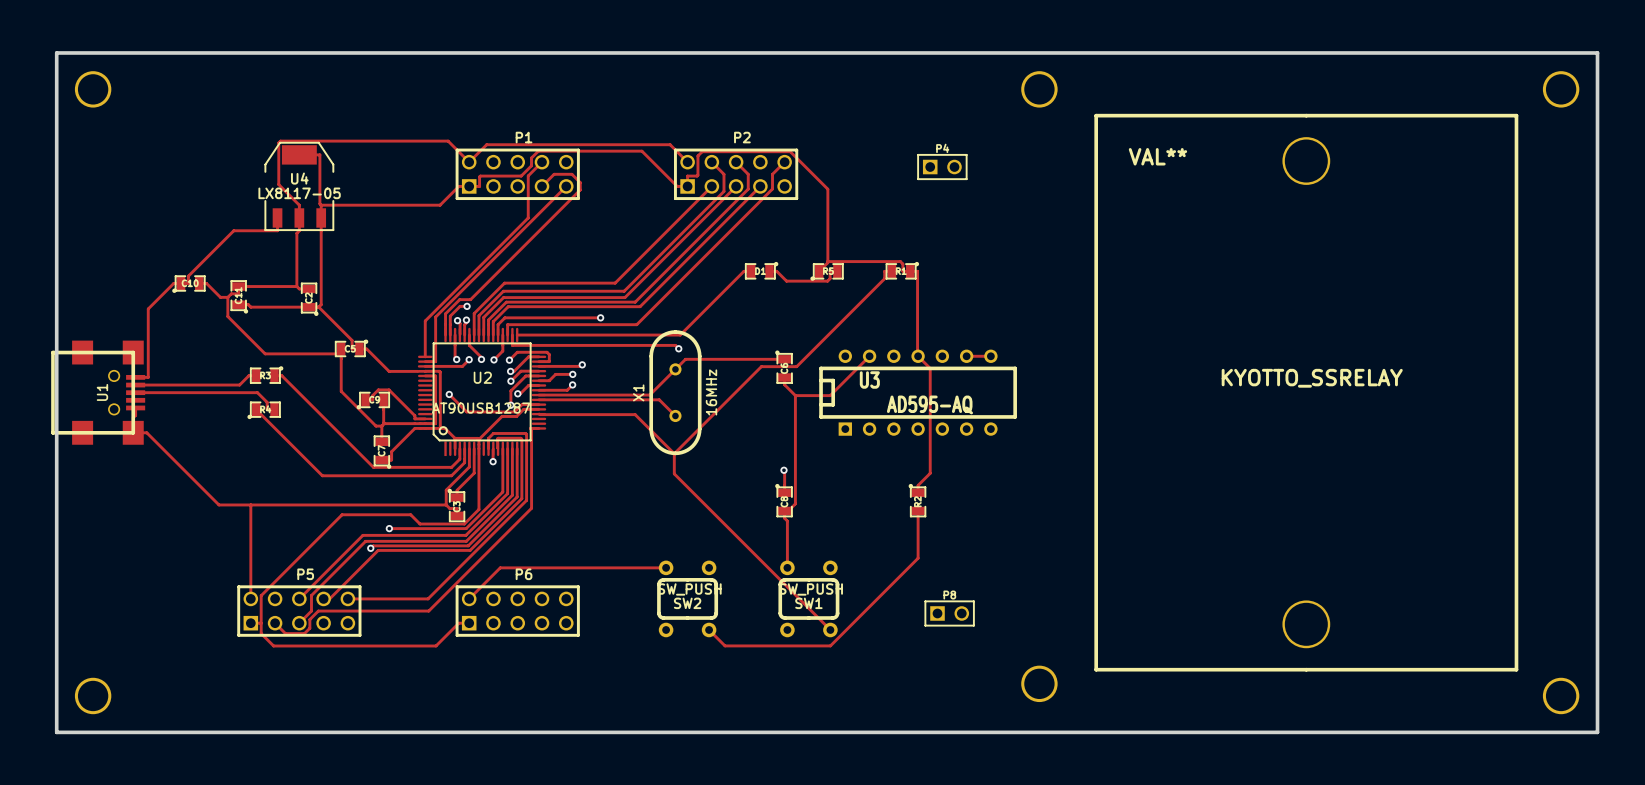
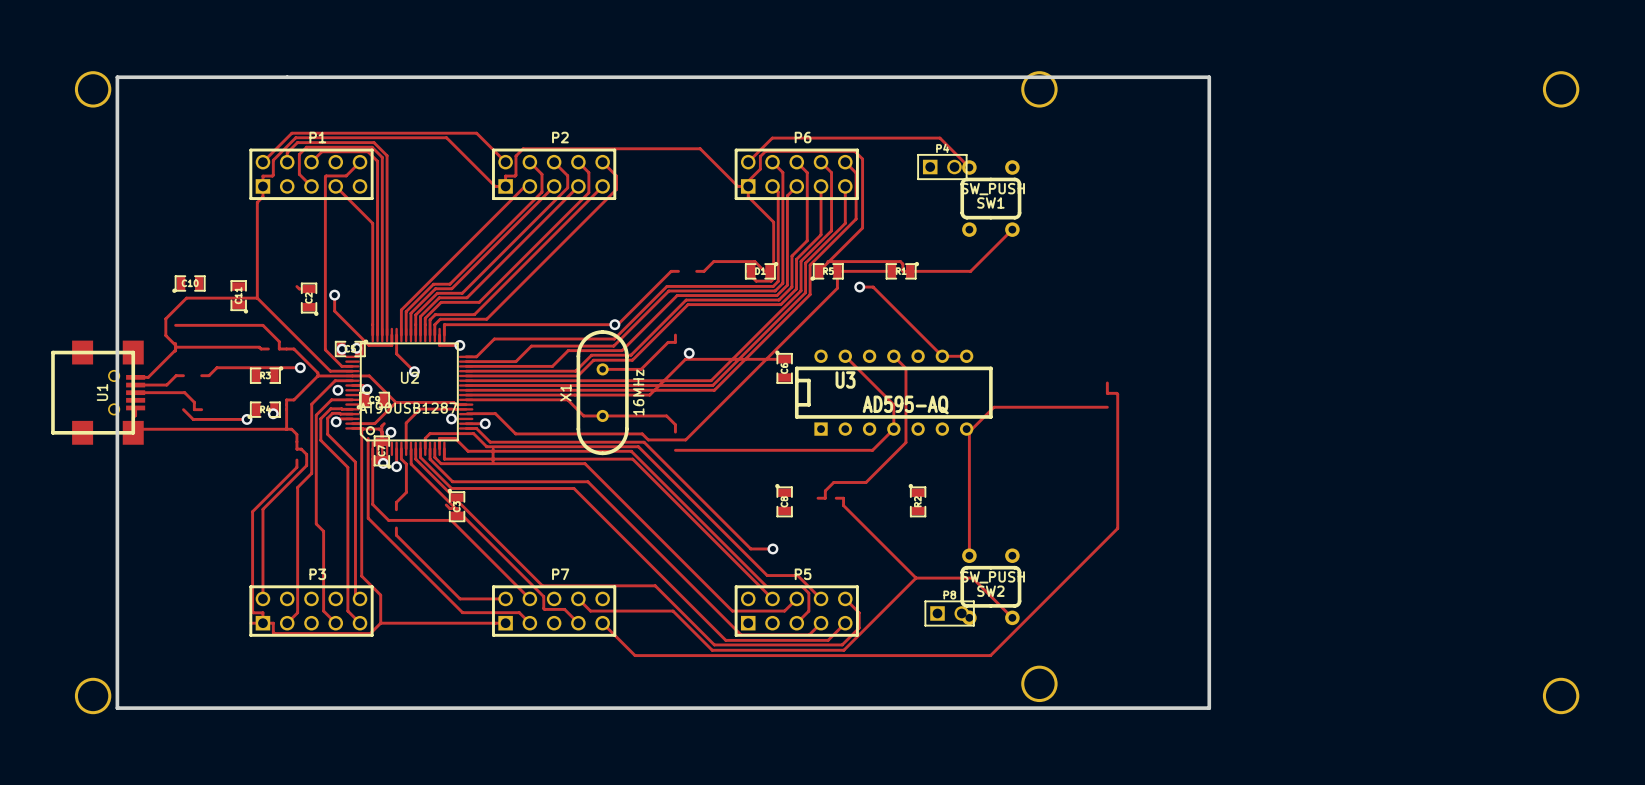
board edge: (56, 52) (1597, 52) (1597, 732) (56, 732) (56, 52) -> (117, 77) (117, 708) (1209, 708) (1209, 77) (117, 77)
track: (299, 154) (319, 154) (321, 205) -> none
track: none -> (262, 162) (291, 133) (476, 133) (505, 162)
track: none -> (287, 162) (287, 152) (297, 142) (373, 142) (387, 155) (387, 335)
track: none -> (311, 162) (321, 151) (368, 151) (377, 161) (377, 335)
track: none -> (360, 162) (346, 175) (325, 176) (325, 349) (341, 366) (352, 366)
track: none -> (529, 162) (542, 174) (542, 192) (449, 284) (433, 284) (406, 311) (406, 335)
track: (542, 162) (528, 175) (528, 218) (425, 320) -> (578, 162) (588, 172) (588, 192) (479, 302) (441, 302) (425, 318) (425, 320)
track: none -> (554, 162) (567, 175) (567, 187) (462, 293) (437, 293) (415, 314) (415, 335)
track: none -> (602, 162) (616, 176) (616, 189) (486, 319) (440, 319) (434, 324) (434, 335)
track: (687, 162) (670, 144) (486, 144) (469, 162) (448, 141) (280, 141) (278, 142) (278, 184) (299, 205) (299, 230) (296, 233) (296, 286) (238, 286) (238, 293) (231, 293) (227, 297) -> none
track: (711, 162) (723, 174) (723, 191) (624, 291) (503, 291) (478, 315) (478, 335) -> none
track: (736, 162) (748, 174) (748, 186) -> none
track: none -> (748, 162) (772, 138) (939, 138) (969, 167)
track: none -> (772, 162) (782, 172) (782, 283) (775, 290) (668, 290) (613, 346) (531, 346) (515, 361) (466, 361)
track: (784, 162) (772, 174) (772, 188) (636, 324) (617, 324) -> (678, 271) (671, 271) (617, 324)
track: none -> (796, 162) (807, 172) (807, 240) (791, 256) (791, 287) (778, 300) (686, 300) (631, 355) (591, 355) (575, 371) (538, 371)
P1 position: (517, 174) -> (311, 174)
P2 position: (736, 174) -> (554, 174)
track: (505, 176) (480, 176) (479, 186) (458, 186) (440, 205) (321, 205) -> (505, 176) (505, 186) (495, 186) (446, 137) (295, 137) (273, 160) (273, 175) (262, 176) (262, 196) (257, 202) (257, 298)
track: (515, 176) (521, 176) (531, 165) (531, 157) (538, 151) (641, 151) (677, 186) (687, 186) (687, 176) (697, 175) (697, 155) (702, 151) (790, 151) (827, 189) (827, 262) -> (515, 176) (515, 156) (523, 148) (700, 148) (737, 186) (748, 186)
U4: LX8117-05 (299, 186) -> none
track: none -> (311, 186) (299, 174) (299, 154) (306, 147) (372, 147) (382, 157) (382, 335)
track: none -> (335, 186) (372, 223) (372, 335)
track: none -> (529, 186) (524, 186) (401, 309) (401, 335)
track: (542, 186) (554, 174) (571, 174) (580, 182) (580, 189) (470, 299) (459, 299) (445, 313) (445, 335) -> none
track: none -> (554, 186) (451, 288) (435, 288) (410, 313) (410, 335)
track: (566, 186) (435, 317) (435, 361) (425, 361) -> none
track: none -> (578, 186) (467, 297) (439, 297) (420, 316) (420, 335)
track: none -> (602, 186) (474, 314) (435, 314) (430, 319) (430, 335)
track: (711, 186) (615, 283) (504, 283) (474, 313) (474, 335) -> none
track: (736, 186) (624, 297) (503, 297) (483, 317) (483, 335) -> none
track: none -> (743, 186) (760, 169) (760, 156) (765, 151) (854, 151) (862, 159) (862, 227) (827, 262)
track: (760, 186) (640, 306) (508, 306) (493, 321) (493, 335) -> none
track: none -> (772, 186) (778, 192) (778, 281) (773, 286) (666, 286) (614, 339) (494, 339) (476, 356) (466, 356)
track: none -> (821, 186) (821, 234) (796, 259) (796, 288) (780, 304) (688, 304) (632, 360) (593, 360) (577, 375) (538, 375)
track: none -> (845, 186) (845, 223) (805, 263) (805, 292) (712, 385) (538, 385)
track: (748, 189) (635, 302) (506, 302) (488, 320) (488, 335) -> (748, 189) (748, 196) (773, 222) (773, 278) (771, 281) (756, 281) (753, 278) (753, 271) (751, 271)
track: (321, 205) (321, 304) (318, 307) -> none
track: (277, 217) (277, 230) (233, 230) (188, 276) (188, 283) (173, 283) (148, 308) (148, 377) -> (175, 343) (175, 350) (148, 377)
track: none -> (696, 271) (704, 271) (713, 261) (754, 261) (764, 271)
track: (746, 271) (743, 271) (680, 335) (517, 335) -> none
track: (769, 271) (776, 271) (786, 281) (827, 281) (830, 278) (830, 271) (837, 271) -> none
track: (884, 271) (884, 278) (796, 366) (761, 366) (674, 453) -> (884, 271) (837, 271) (837, 288) (685, 439) (648, 439) (642, 433) (515, 433) (495, 413) (467, 413)
track: (917, 271) (917, 355) (930, 368) (930, 473) (918, 485) (918, 492) -> (917, 271) (970, 271) (1012, 229)
track: (199, 283) (206, 283) (220, 297) (227, 297) -> none
via: none -> (859, 287)
track: none -> (334, 295) (334, 311) (368, 345) (391, 345) (391, 335)
via: none -> (334, 295)
track: (227, 297) (227, 316) (265, 353) (341, 353) -> none
track: none -> (257, 298) (330, 371) (352, 371)
track: none -> (257, 298) (186, 298) (165, 318) (165, 335) (175, 345)
track: (238, 304) (248, 304) (250, 307) (318, 307) -> none
track: (467, 306) (460, 306) (450, 316) (450, 335) -> none
via: (467, 306) -> none
track: (318, 307) (352, 340) (352, 349) (366, 349) (389, 371) (425, 371) -> none
track: (600, 317) (504, 317) (498, 324) (498, 335) -> none
via: (600, 317) -> none
track: (457, 320) (460, 323) (459, 335) -> none
via: (457, 320) -> none
track: (466, 320) (464, 335) -> none
via: (466, 320) -> none
track: (507, 324) (507, 335) -> (507, 324) (444, 324) (444, 335)
via: none -> (614, 324)
track: none -> (175, 325) (262, 325) (279, 341) (279, 349) (293, 349) (317, 373) (317, 375)
track: none -> (396, 335) (396, 353) (414, 371)
track: (425, 335) (425, 356) -> none
track: none -> (439, 335) (439, 345) (459, 345)
track: (455, 335) (456, 359) -> none
track: (469, 335) (469, 345) (481, 359) -> none
track: (502, 335) (502, 351) (493, 359) -> none
track: (512, 335) (512, 345) (675, 345) (678, 348) -> none
track: none -> (675, 335) (675, 342) (668, 342) (641, 369) (602, 369)
via: none -> (459, 345)
track: none -> (175, 347) (259, 347) (268, 349)
via: none -> (356, 348)
via: (678, 348) -> none
track: (341, 349) (341, 391) (376, 426) (381, 426) -> none
via: none -> (342, 349)
via: none -> (689, 353)
track: (538, 356) (528, 356) (514, 371) (510, 371) -> none
track: none -> (845, 356) (893, 404) (893, 429) (872, 450) (675, 450)
track: (869, 356) (830, 395) (795, 395) -> none
track: none -> (893, 356) (905, 368) (905, 442) (866, 482) (833, 482) (825, 490) (825, 498) (818, 498)
track: (966, 356) (990, 356) -> (966, 356) (942, 356) (873, 287) (859, 287)
via: (456, 359) -> none
track: (469, 359) (462, 366) (425, 366) -> none
via: (469, 359) -> none
via: (481, 359) -> none
via: (493, 359) -> none
track: (509, 360) (517, 352) (547, 352) (549, 354) (549, 361) (538, 361) -> none
via: (509, 360) -> none
track: (582, 364) (552, 366) -> (796, 186) (787, 195) (787, 285) (777, 295) (677, 295) (622, 350) (568, 350) (552, 366)
via: (582, 364) -> none
track: none -> (466, 366) (538, 366)
track: none -> (300, 367) (216, 367) (209, 375) (201, 375)
via: none -> (300, 367)
via: none -> (414, 371)
track: (425, 371) (440, 372) (440, 428) -> none
via: (510, 371) -> none
track: (520, 371) (510, 381) -> (520, 371) (466, 371)
track: (572, 374) (555, 374) (549, 380) -> (821, 162) (831, 172) (831, 230) (801, 261) (801, 290) (711, 380) (549, 380)
via: (572, 374) -> none
track: (256, 375) (248, 375) (239, 385) (166, 385) -> (183, 375) (176, 375) (166, 385)
track: (274, 375) (281, 375) (373, 467) (451, 467) (459, 459) (459, 448) -> none
track: none -> (317, 375) (369, 375) (395, 402)
track: none -> (317, 375) (293, 399) (286, 399) (286, 429)
track: (425, 375) (435, 375) (435, 423) (384, 423) (383, 399) -> none
track: (525, 375) (510, 390) (510, 405) -> (525, 375) (466, 375)
track: (784, 377) (784, 384) (795, 395) -> none
track: none -> (352, 380) (335, 380) (311, 404) (311, 473) (297, 487) (297, 612) (287, 623)
track: none -> (466, 380) (538, 380)
via: (510, 381) -> none
track: none -> (1107, 382) (1107, 393) (1117, 394) (1117, 528) (990, 655) (635, 655) (602, 623)
track: (572, 384) (567, 390) -> (845, 162) (856, 172) (856, 219) (810, 265) (810, 294) (714, 390) (567, 390)
via: (572, 384) -> none
track: none -> (352, 385) (363, 385) (367, 389)
track: (528, 385) (520, 393) (517, 393) -> (528, 385) (466, 385)
via: none -> (367, 389)
via: none -> (337, 390)
track: none -> (466, 390) (538, 390)
U2 position: (482, 391) -> (409, 391)
track: (184, 392) (257, 392) (267, 402) (268, 409) -> (184, 392) (194, 402) (194, 409) (201, 409)
X1 position: (675, 392) -> (602, 392)
U3 position: (918, 392) -> (893, 392)
KYOTTO_SSRELAY: VAL** (1306, 392) -> none
via: (517, 393) -> none
track: (449, 394) (466, 411) (514, 411) (522, 404) (538, 404) -> none
via: (449, 394) -> none
track: none -> (466, 395) (538, 395)
track: (795, 395) (795, 503) (784, 514) -> none
track: none -> (352, 399) (331, 399) (316, 415) (316, 523) (323, 531) (323, 611) (335, 623)
track: (365, 399) (372, 399) (372, 395) (378, 389) (389, 389) (414, 415) (414, 418) (425, 418) -> none
track: none -> (466, 399) (538, 399)
track: (567, 399) (659, 399) (675, 415) -> (567, 399) (583, 415) (666, 415) (675, 424) (675, 432)
track: none -> (395, 402) (453, 402) (455, 404) (466, 404)
track: none -> (395, 402) (374, 423) (352, 423)
via: (510, 405) -> none
track: none -> (1107, 407) (994, 407) (969, 431)
track: none -> (183, 409) (193, 419) (246, 419)
track: (256, 409) (322, 475) (451, 475) (464, 462) (464, 448) -> none
track: none -> (352, 409) (330, 408) (320, 418) (320, 440) (347, 467) (347, 611) (360, 623)
track: none -> (466, 409) (420, 409) (406, 423) (406, 448)
track: (538, 409) (523, 409) (516, 416) (502, 416) (478, 439) -> none
via: none -> (273, 413)
track: none -> (352, 414) (332, 413) (327, 418) (327, 434) (355, 462) (355, 594) (360, 598)
track: (540, 414) (635, 414) (674, 453) -> none
track: none -> (352, 418) (339, 418) (336, 421)
via: none -> (451, 418)
via: none -> (246, 419)
via: none -> (336, 421)
track: none -> (466, 423) (485, 423)
via: none -> (485, 423)
track: none -> (352, 428) (362, 429)
track: none -> (466, 428) (476, 428) (490, 442) (644, 442) (750, 548) (772, 548)
track: (538, 428) (530, 428) (531, 508) (428, 611) (318, 611) (309, 619) (309, 628) (304, 633) (285, 633) (275, 623) -> none
track: none -> (135, 429) (291, 429) (296, 434) (296, 449) (301, 449) (306, 454) (306, 465) (262, 509) (262, 598)
track: none -> (969, 431) (969, 555)
track: (133, 432) (146, 432) (218, 504) (446, 504) (446, 490) (469, 466) (469, 448) -> none
via: none -> (390, 432)
track: none -> (368, 438) (368, 518) (462, 612) (519, 612) (529, 623)
track: (455, 438) (478, 439) -> (455, 438) (439, 438) (439, 448)
track: none -> (455, 438) (468, 451) (631, 451) (766, 586) (802, 586) (808, 593) (808, 611) (796, 623)
track: (478, 439) (478, 509) (464, 524) (420, 524) (410, 514) (342, 514) (261, 595) (261, 633) (273, 646) (436, 646) (458, 623) -> (380, 623) (458, 623)
track: none -> (372, 448) (372, 504) (388, 520) (451, 520) (529, 598)
track: none -> (382, 448) (382, 432) (379, 429) (361, 429) (361, 576) (380, 595) (380, 623)
track: none -> (396, 448) (396, 466)
track: none -> (401, 448) (401, 459) (406, 464) (406, 492) (396, 502) (396, 509)
track: none -> (410, 448) (411, 464) (543, 596) (543, 608) (564, 609) (578, 623)
track: none -> (415, 448) (415, 459) (542, 585) (655, 585) (714, 644) (842, 644) (859, 627) (859, 612) (845, 598)
track: none -> (420, 448) (420, 457) (451, 488) (573, 488) (725, 640) (828, 640) (845, 623)
track: none -> (425, 448) (425, 438) (430, 433) (473, 433) (486, 446) (638, 446) (767, 575) (797, 575) (821, 598)
track: none -> (430, 448) (430, 459) (452, 481) (587, 481) (741, 634) (809, 634) (821, 623)
track: none -> (434, 448) (434, 457) (441, 463) (585, 463) (732, 611) (784, 611) (796, 598)
track: none -> (444, 448) (444, 459) (632, 459) (772, 598)
track: (455, 448) (455, 438) (445, 428) (414, 428) (391, 451) (391, 460) (381, 460) -> none
track: (474, 448) (474, 473) (457, 490) (457, 497) -> none
track: (488, 448) (488, 438) (493, 433) (526, 434) (526, 500) (428, 598) (347, 598) -> none
track: (498, 448) (498, 438) (521, 439) (521, 498) (470, 550) (378, 550) (329, 598) (323, 598) -> none
track: (502, 448) (502, 491) (466, 528) (389, 528) -> none
track: (507, 448) (507, 493) (465, 535) (362, 535) (299, 598) -> none
track: (512, 448) (512, 495) (466, 541) (365, 541) (311, 595) (311, 611) (299, 623) -> none
track: (517, 448) (517, 496) (468, 545) (373, 545) (370, 548) -> none
track: (674, 453) (674, 473) (830, 629) -> none
track: none -> (296, 460) (296, 467) (252, 511) (252, 612) (262, 612) (262, 623) (273, 623) (274, 633) (370, 633) (380, 623)
via: (493, 461) -> none
via: none -> (383, 463)
via: none -> (396, 466)
track: (783, 470) (784, 492) -> none
via: (783, 470) -> none
track: none -> (836, 498) (843, 498) (843, 505) (916, 578)
track: (250, 504) (250, 598) -> none
track: (784, 510) (784, 518) (787, 521) (787, 567) -> none
track: (918, 510) (918, 558) (830, 645) (725, 645) (709, 629) -> none
track: none -> (396, 527) (396, 535) (460, 598) (505, 598)
via: (389, 528) -> none
via: (370, 548) -> none
via: none -> (772, 548)
track: (666, 567) (500, 567) (469, 598) -> none
track: none -> (916, 578) (843, 650) (712, 650) (673, 611) (590, 611) (578, 598)
track: none -> (916, 578) (972, 578) (1012, 617)
SW2 position: (687, 598) -> (990, 586)
SW1 position: (808, 598) -> (990, 198)
P5 position: (299, 611) -> (796, 611)
P3: none -> (311, 611)
P6 position: (517, 611) -> (796, 174)
P7: none -> (554, 611)
track: none -> (469, 623) (505, 623)

